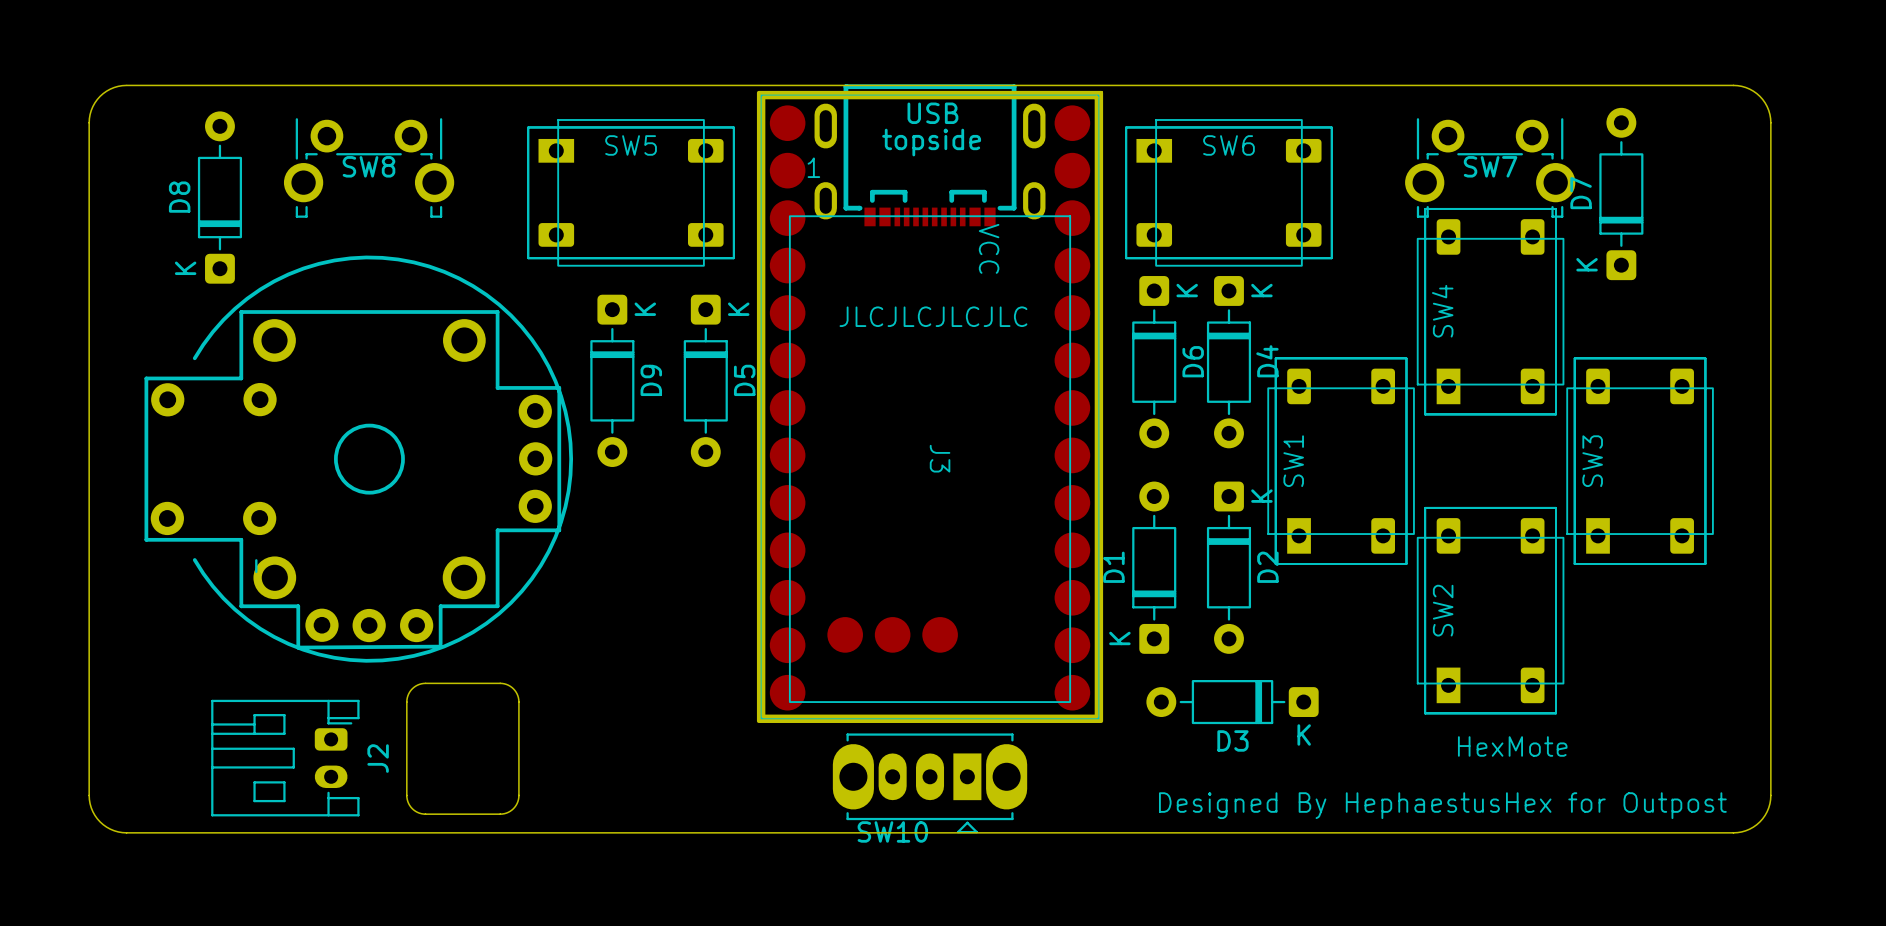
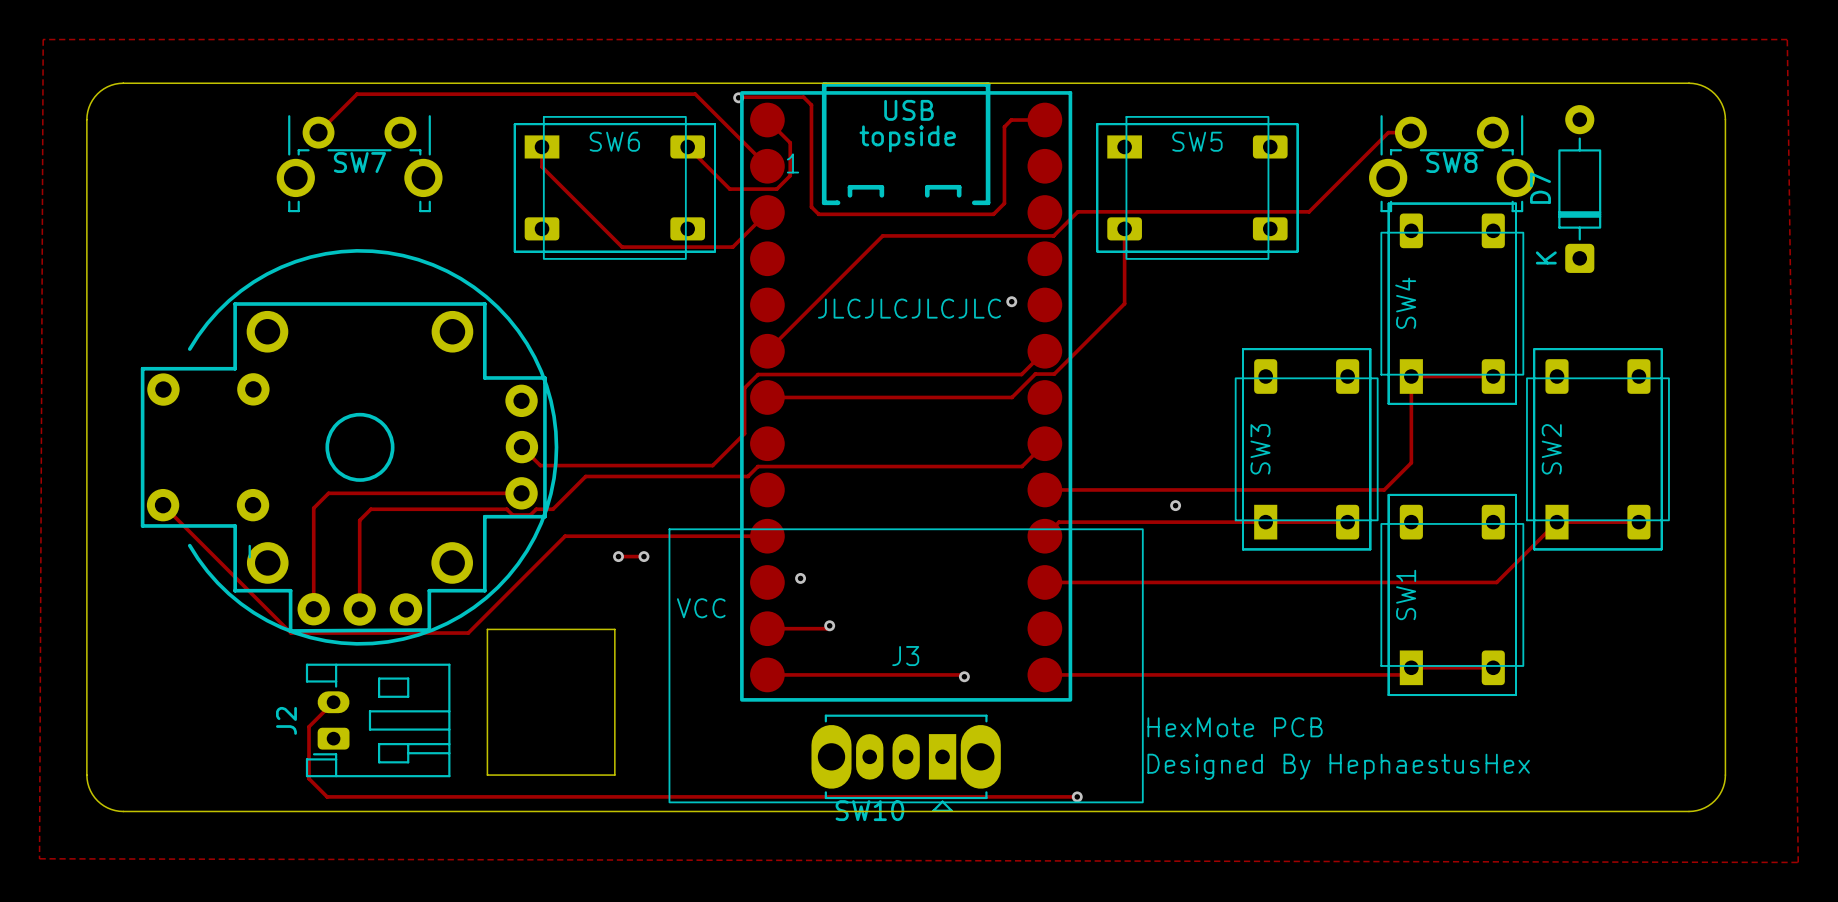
zone outline: none -> (43, 39) (39, 858) (1798, 862) (1787, 39) (43, 39)
part footprint: [756, 84, 1104, 723] -> [740, 82, 1073, 702]
track: none -> (738, 97) (803, 97) (811, 105) (811, 207) (818, 214) (993, 214) (1004, 203) (1004, 126) (1011, 120) (1044, 120)
via: none -> (738, 97)
track: none -> (767, 120) (790, 142) (790, 175) (776, 189) (729, 189) (687, 146)
track: none -> (318, 132) (357, 94) (695, 94) (767, 166)
track: none -> (1410, 132) (1388, 132) (1309, 211) (1077, 211) (1053, 235) (882, 235) (767, 351)
SW5 name: SW5 (631, 145) -> SW6 (614, 141)
SW6 name: SW6 (1228, 145) -> SW5 (1197, 141)
track: none -> (542, 146) (542, 166) (622, 247) (732, 247) (767, 212)
SW8 name: SW8 (368, 166) -> SW7 (359, 162)
SW7 name: SW7 (1490, 166) -> SW8 (1451, 162)
D8: (219, 197) -> none
track: none -> (1124, 228) (1124, 303) (1054, 374) (1035, 374) (1012, 397) (767, 397)
via: none -> (1011, 301)
track: none -> (1044, 351) (1021, 374) (758, 374) (744, 388) (744, 433) (712, 465) (540, 465) (521, 447)
D6: (1154, 362) -> none
D4: (1228, 362) -> none
D9: (612, 380) -> none
D5: (705, 380) -> none
track: none -> (1493, 376) (1411, 376) (1411, 462) (1384, 489) (1044, 489)
track: none -> (1044, 443) (1022, 466) (757, 466) (748, 476) (585, 476) (552, 509) (536, 509) (530, 514) (512, 514) (506, 509) (370, 509) (359, 520) (359, 609) (356, 606)
J3 rotation: 0° (930, 459) -> 90° counterclockwise (906, 665)
SW1 name: SW1 (1293, 461) -> SW3 (1260, 449)
SW3 name: SW3 (1592, 461) -> SW2 (1551, 449)
track: none -> (521, 493) (328, 493) (313, 508) (313, 609)
track: none -> (163, 505) (290, 633) (468, 633) (565, 536) (767, 536)
via: none -> (1175, 505)
track: none -> (1347, 522) (1058, 522) (1044, 536)
track: none -> (1638, 522) (1557, 522) (1496, 582) (1044, 582)
D1: (1154, 567) -> none
D2: (1228, 567) -> none
track: none -> (618, 556) (643, 556)
via: none -> (618, 556)
via: none -> (643, 556)
via: none -> (800, 578)
SW2 name: SW2 (1443, 610) -> SW1 (1406, 594)
track: none -> (829, 625) (826, 628) (767, 628)
via: none -> (829, 625)
board edge: none -> (487, 629) (614, 629) (614, 775) (487, 775) (487, 629)
board edge: (425, 683) (413, 687) (406, 699) (406, 795) (409, 805) (415, 811) (423, 814) (500, 814) (510, 811) (516, 805) (518, 795) (518, 702) (516, 692) (510, 686) (502, 683) (425, 683) -> none
track: none -> (1493, 667) (1410, 667) (1403, 674) (1044, 674)
track: none -> (767, 674) (962, 674) (964, 676)
via: none -> (964, 676)
D3: (1232, 702) -> none
track: none -> (333, 702) (308, 726) (308, 778) (327, 796) (1077, 796)
text: none -> HexMote PCB (1235, 727)
text: HexMote (1512, 746) -> none
J2 rotation: 0° (285, 758) -> 180° (378, 720)
J2 position: (285, 758) -> (378, 720)
text: Designed By HephaestusHex for Outpost (1442, 805) -> Designed By HephaestusHex (1338, 766)
via: none -> (1077, 796)

